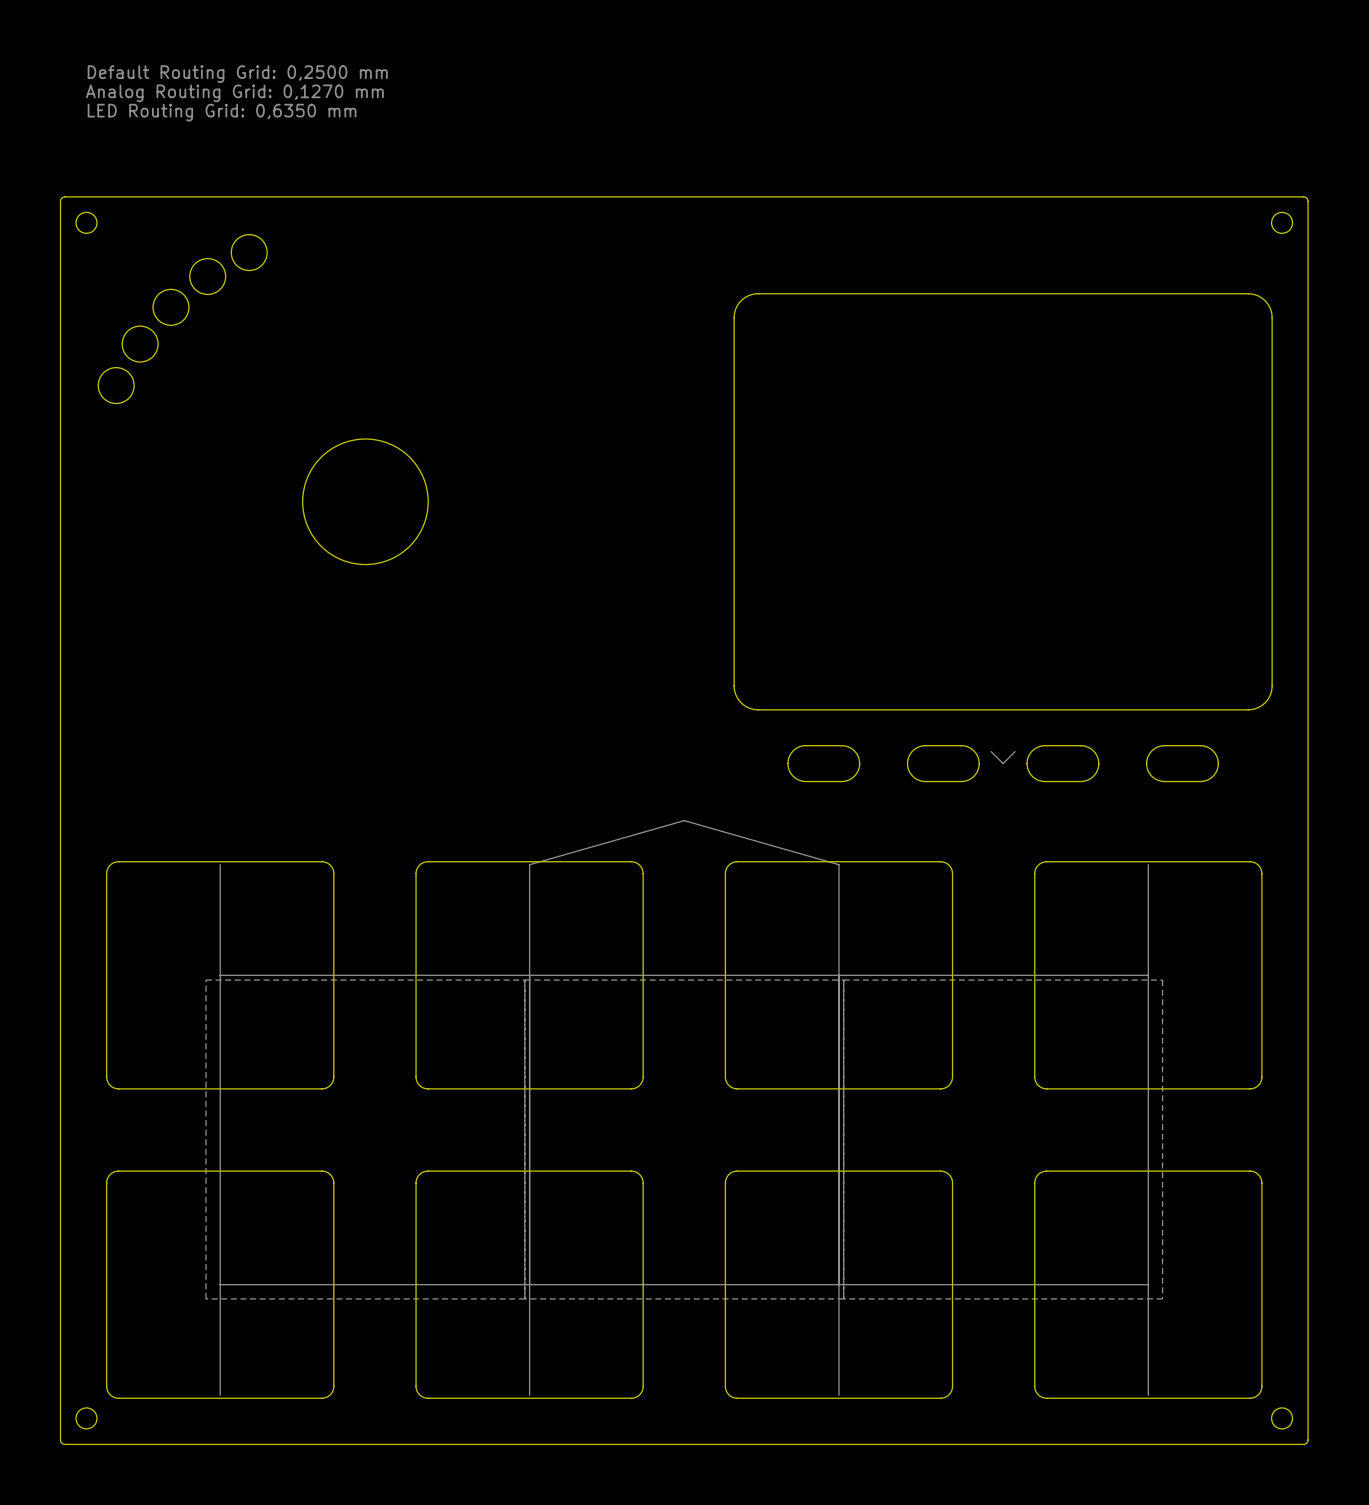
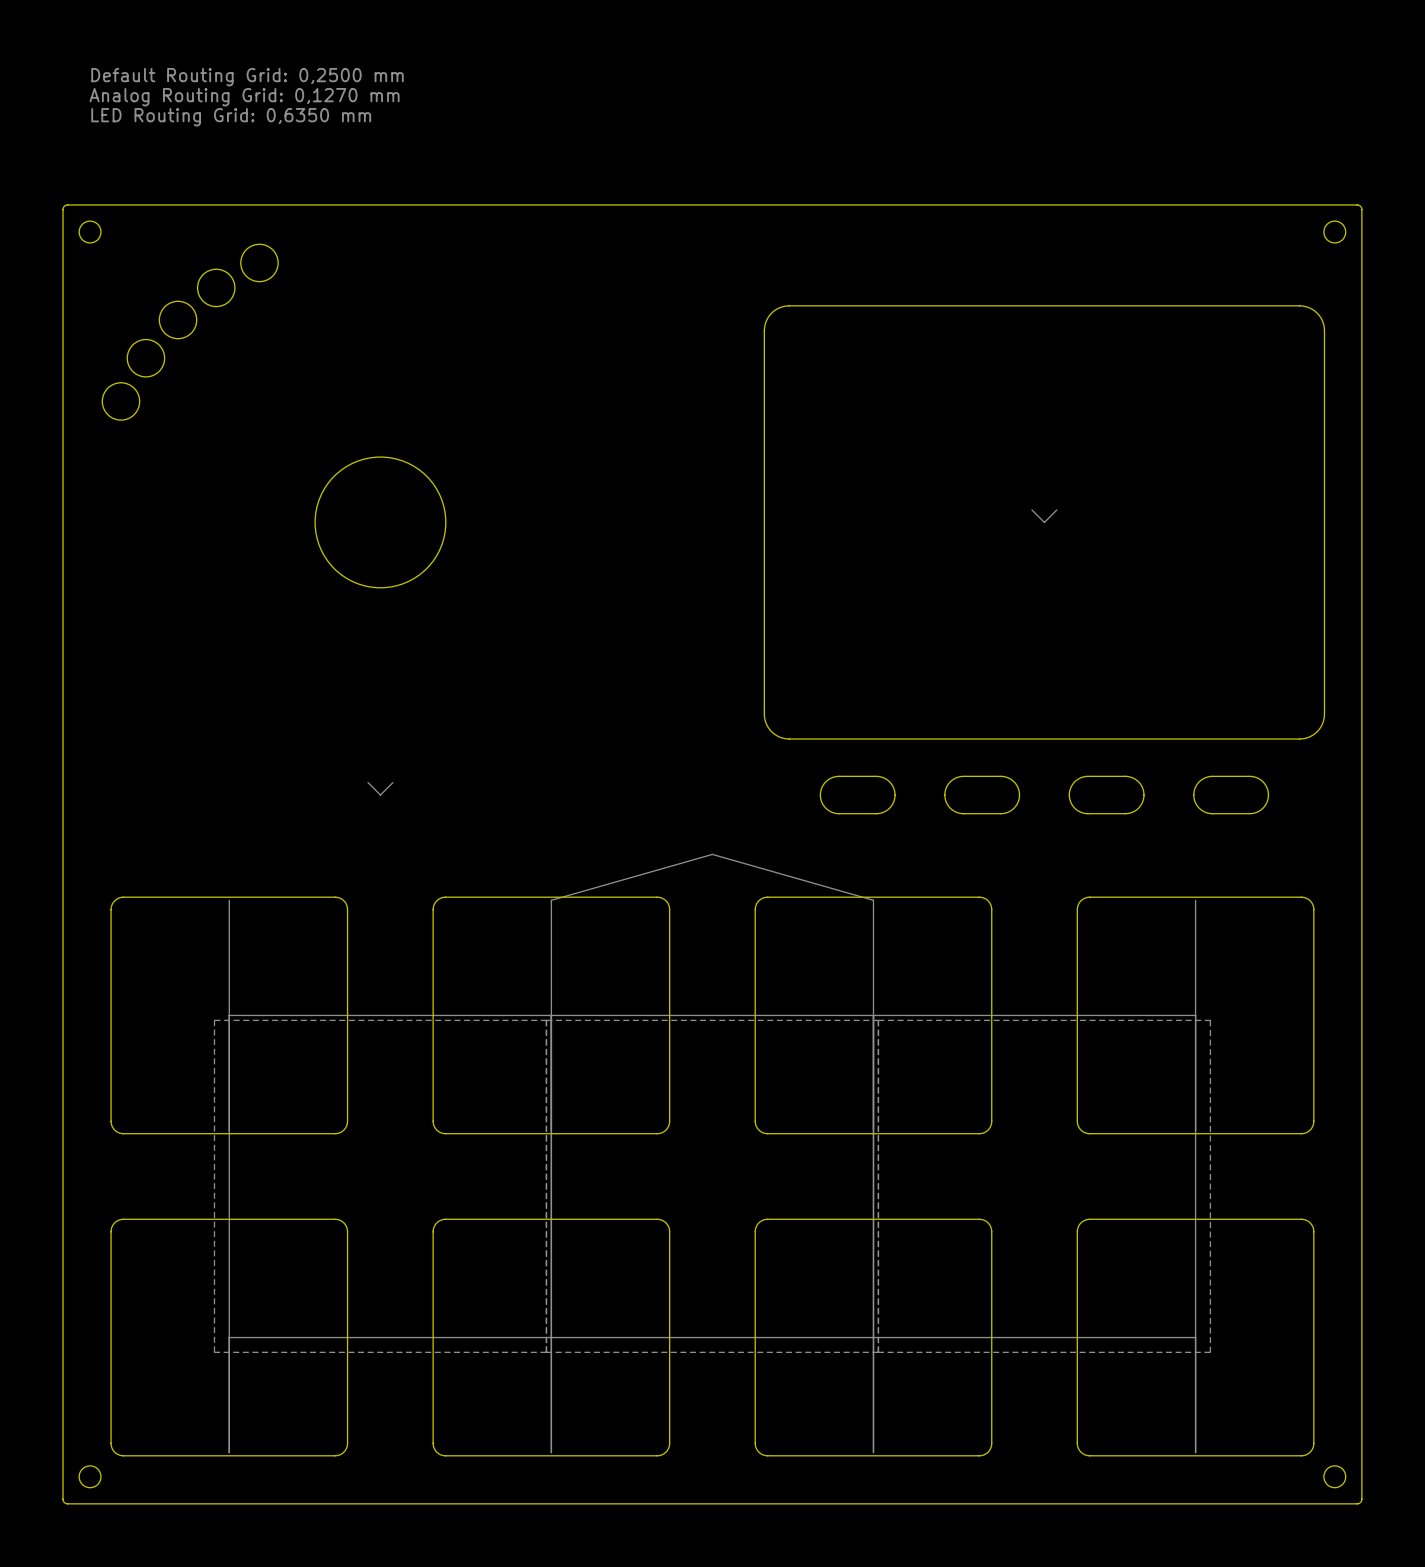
drawing: none -> [62, 204, 1363, 1505]
line: none -> (368, 782) (380, 795) (392, 782)
line: (991, 751) (1003, 763) (1015, 751) -> none

